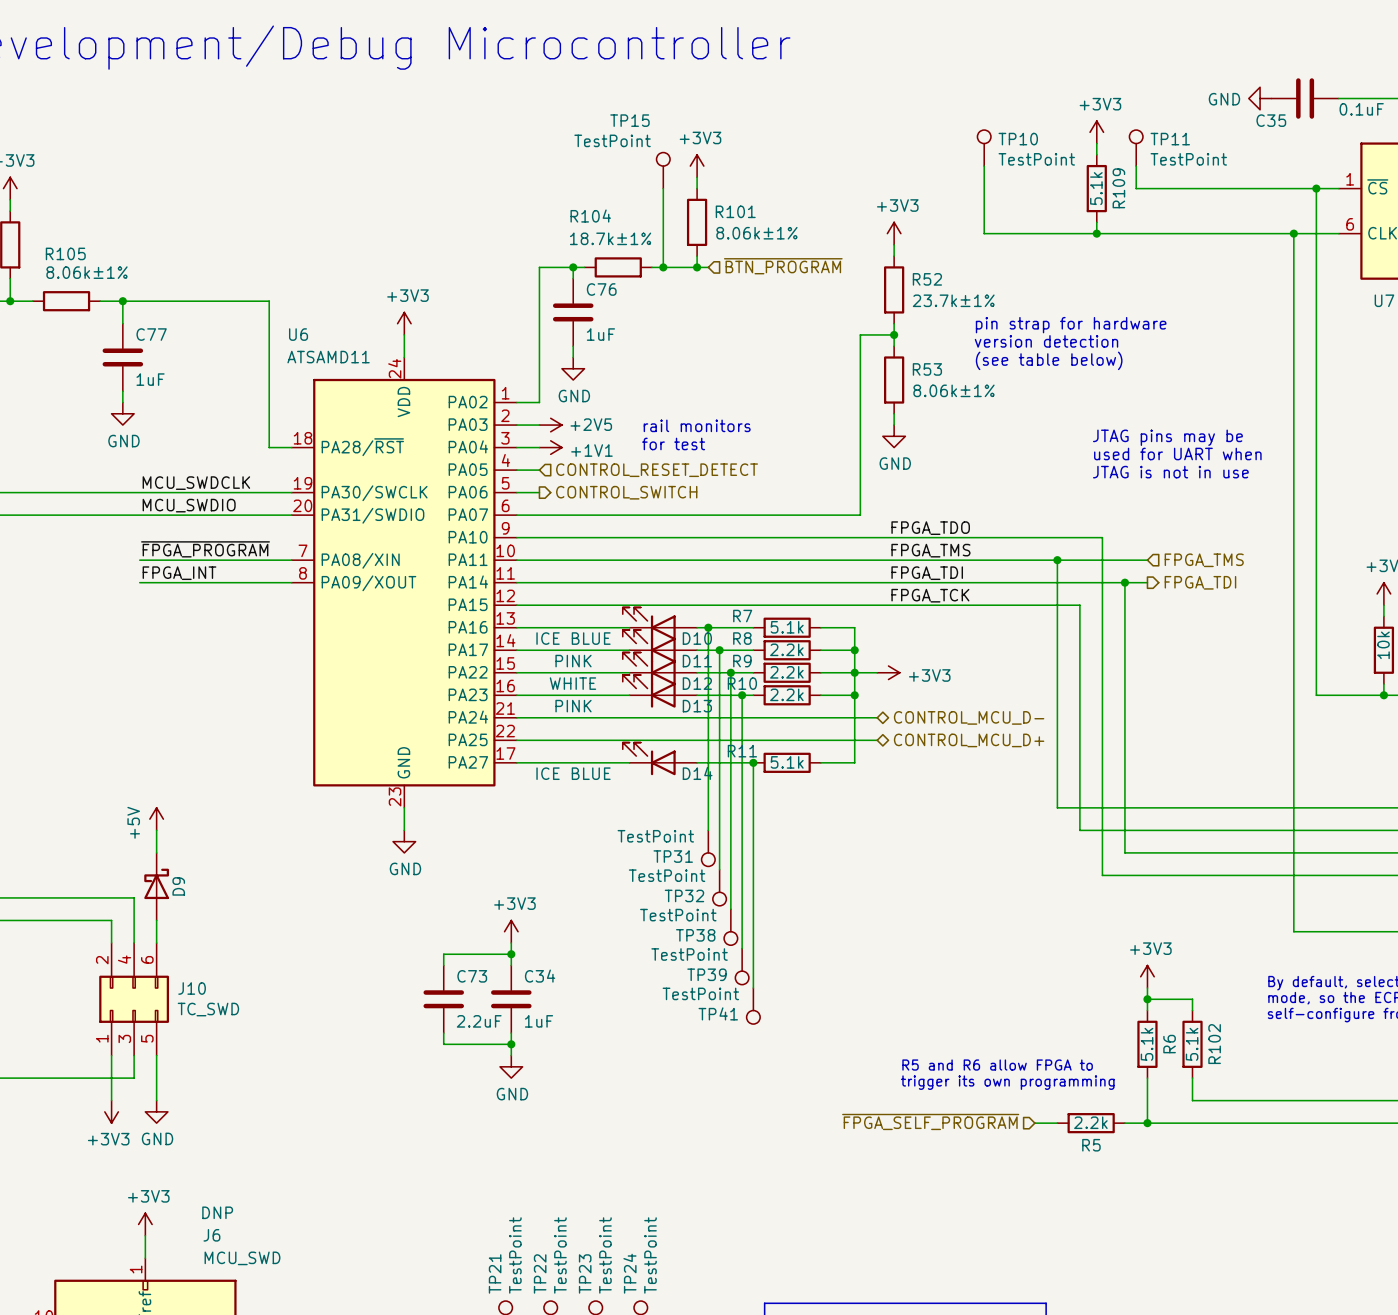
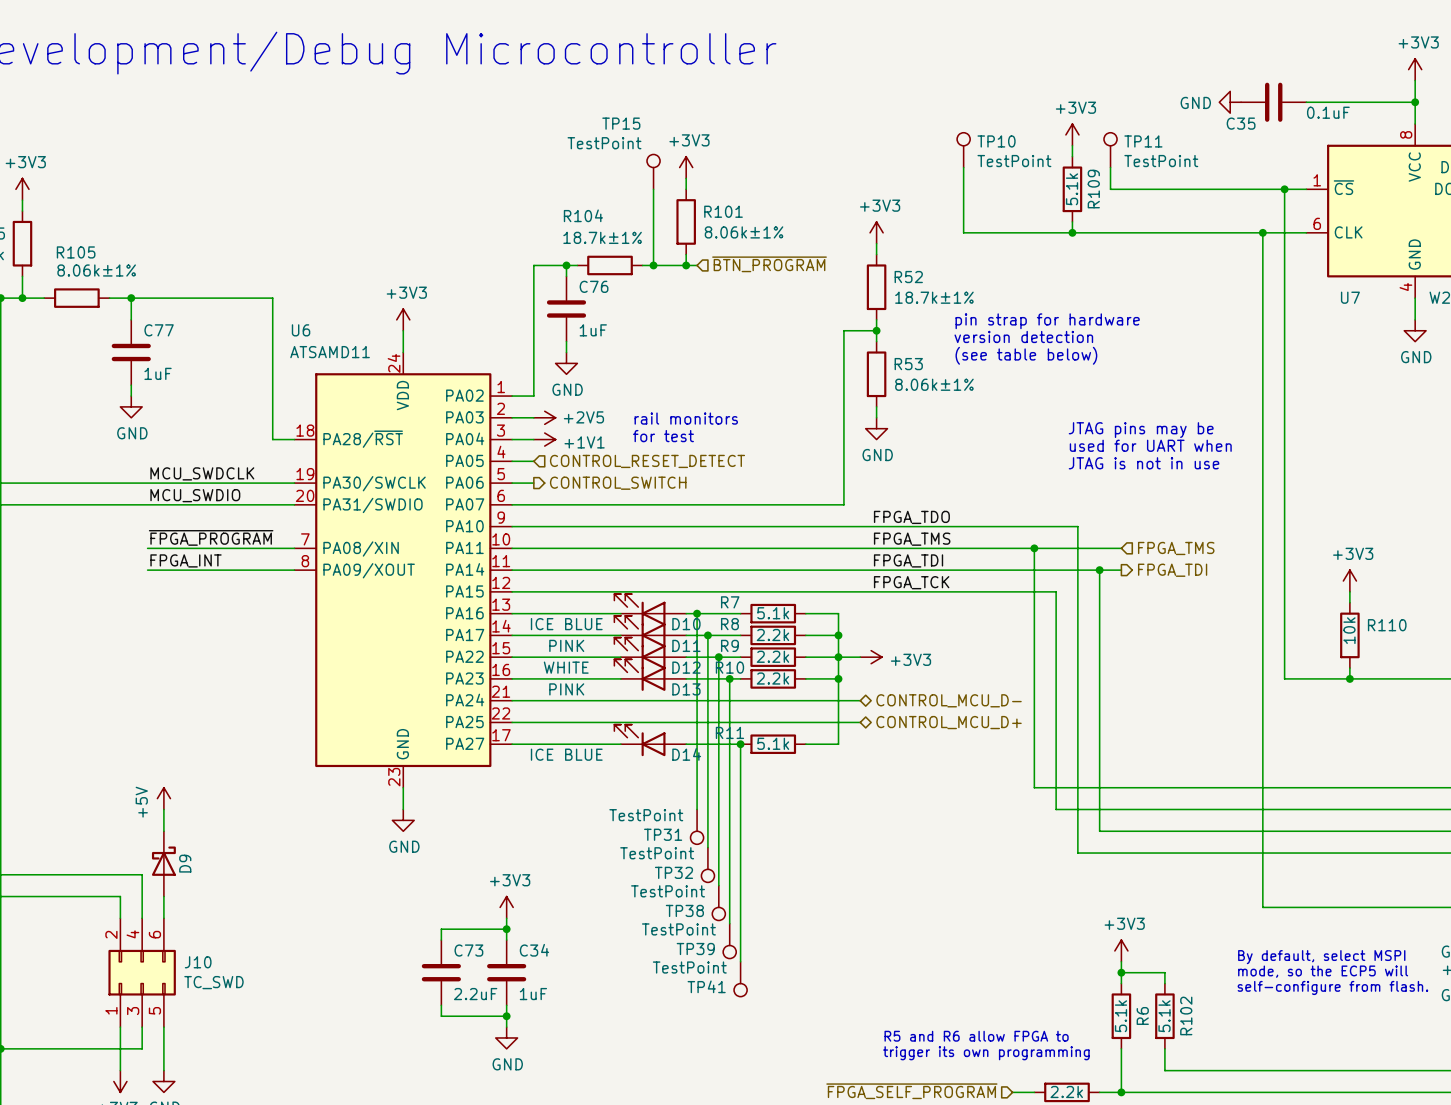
R52 value: 23.7k±1% (953, 300) -> 18.7k±1% (934, 297)

